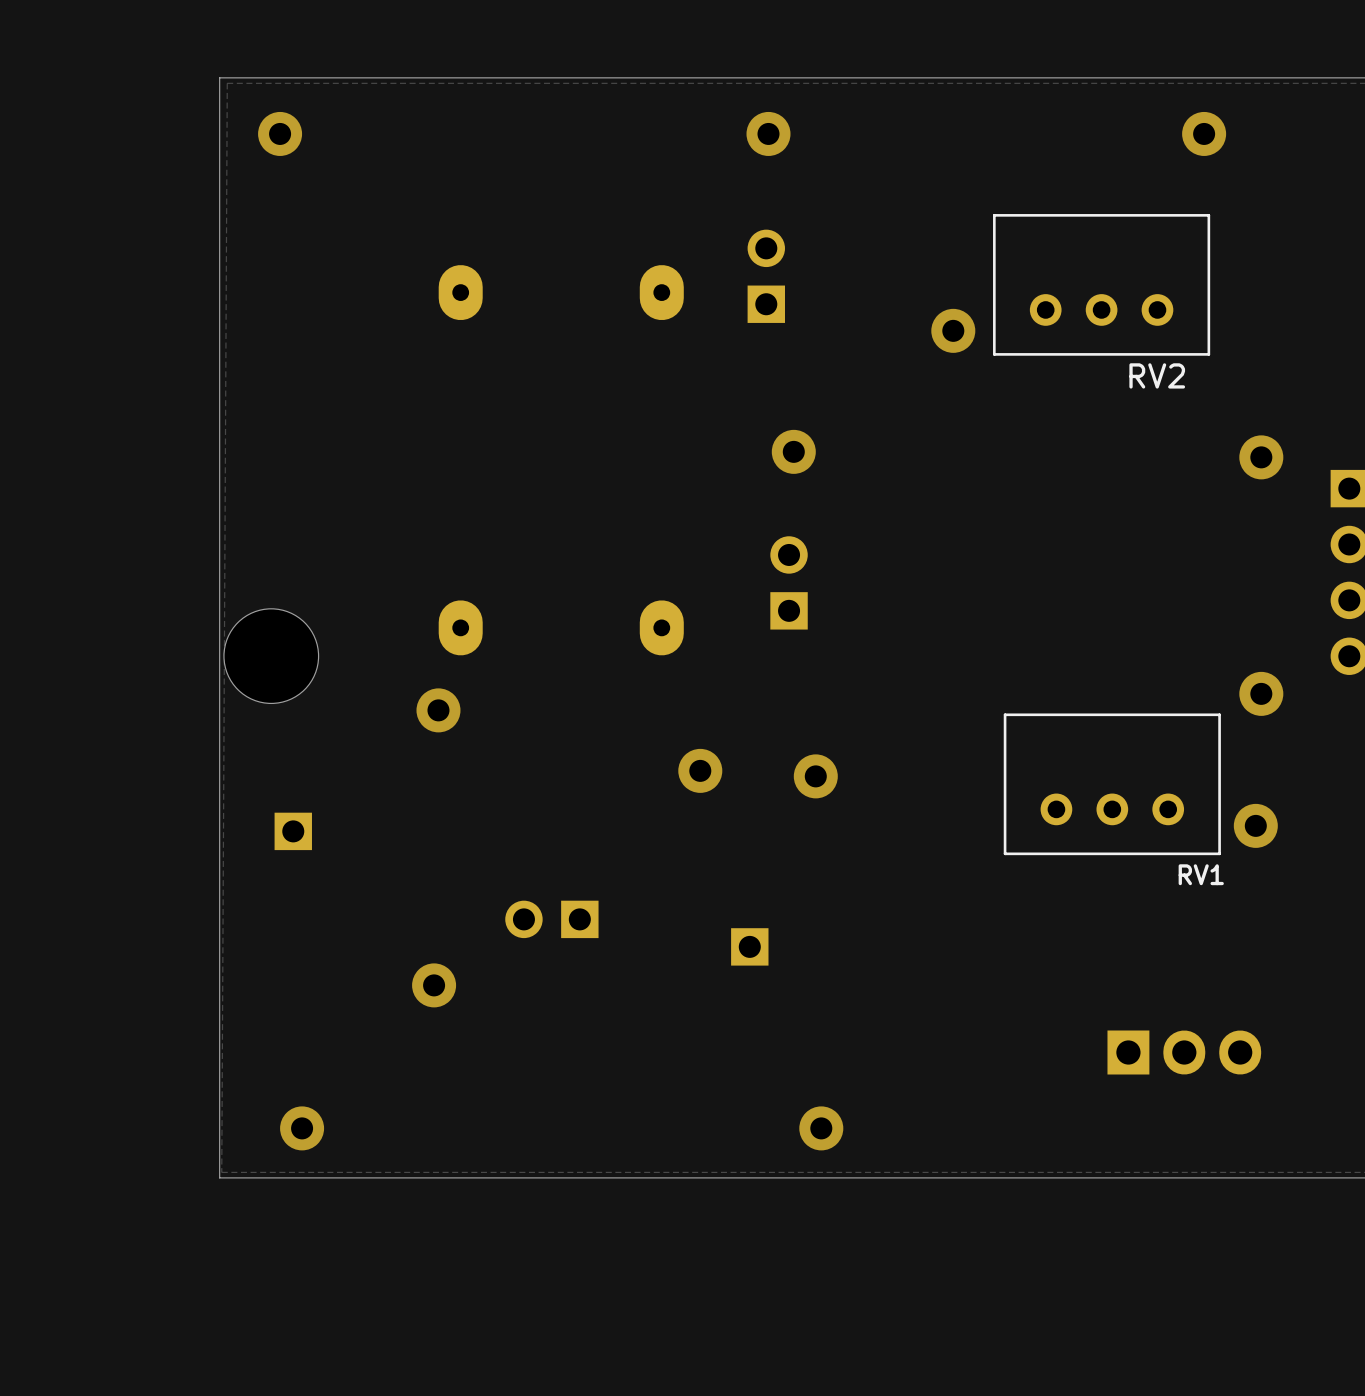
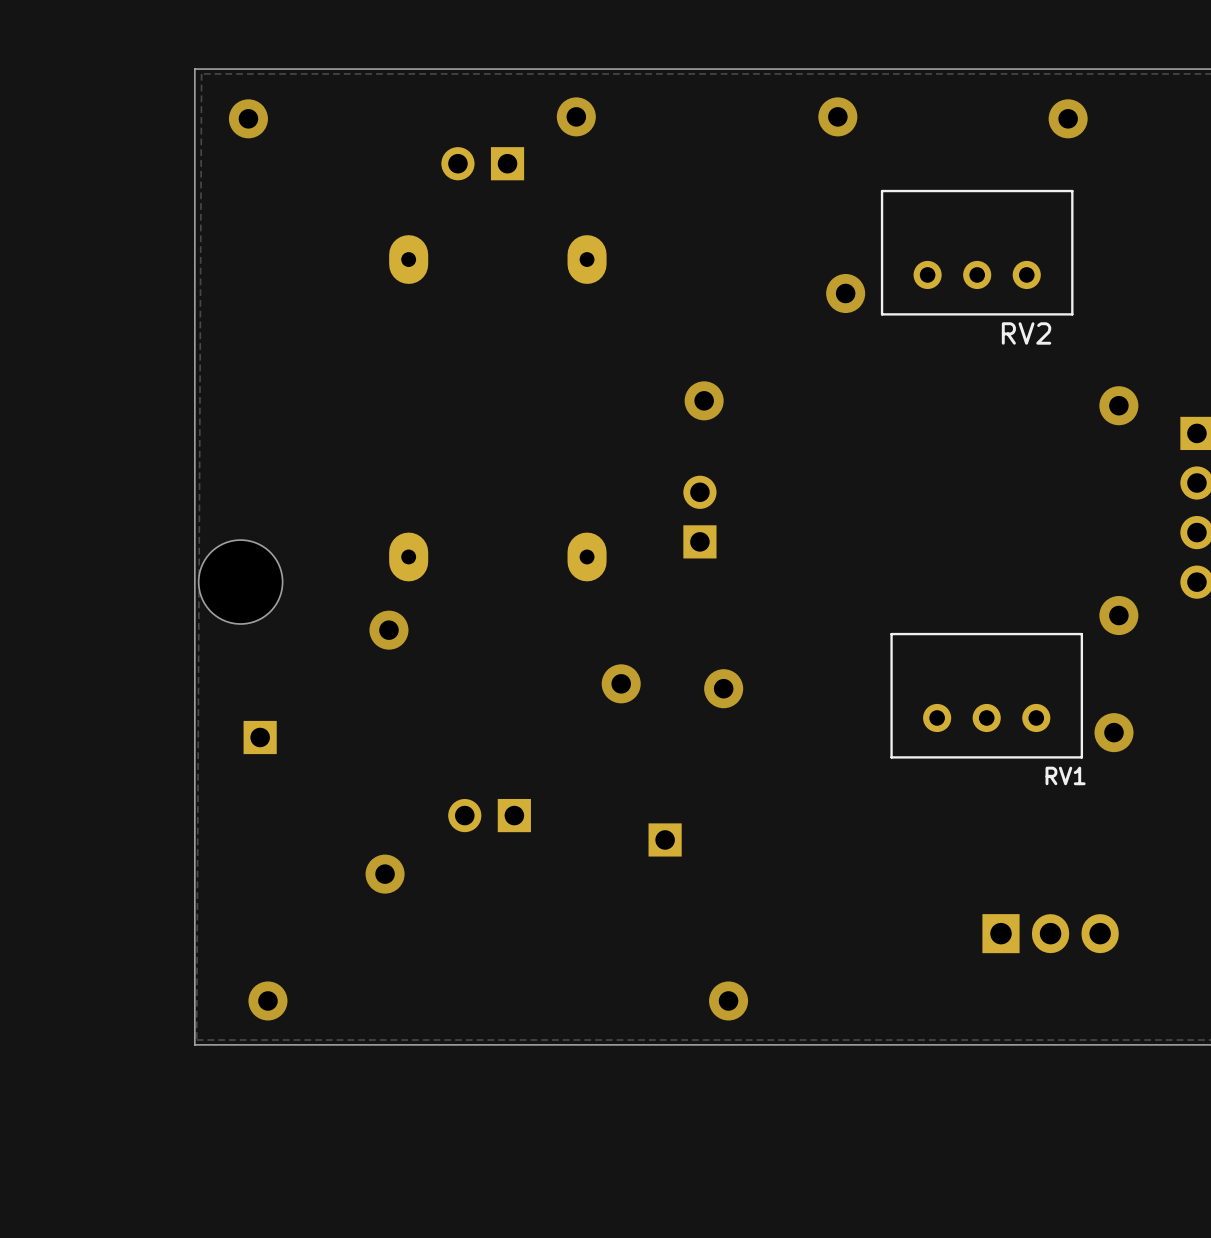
via: none -> (576, 116)
via: none -> (837, 116)
via: (768, 133) -> none
part rotation: 0° (766, 276) -> 90° counterclockwise (482, 163)
part position: (766, 276) -> (482, 163)

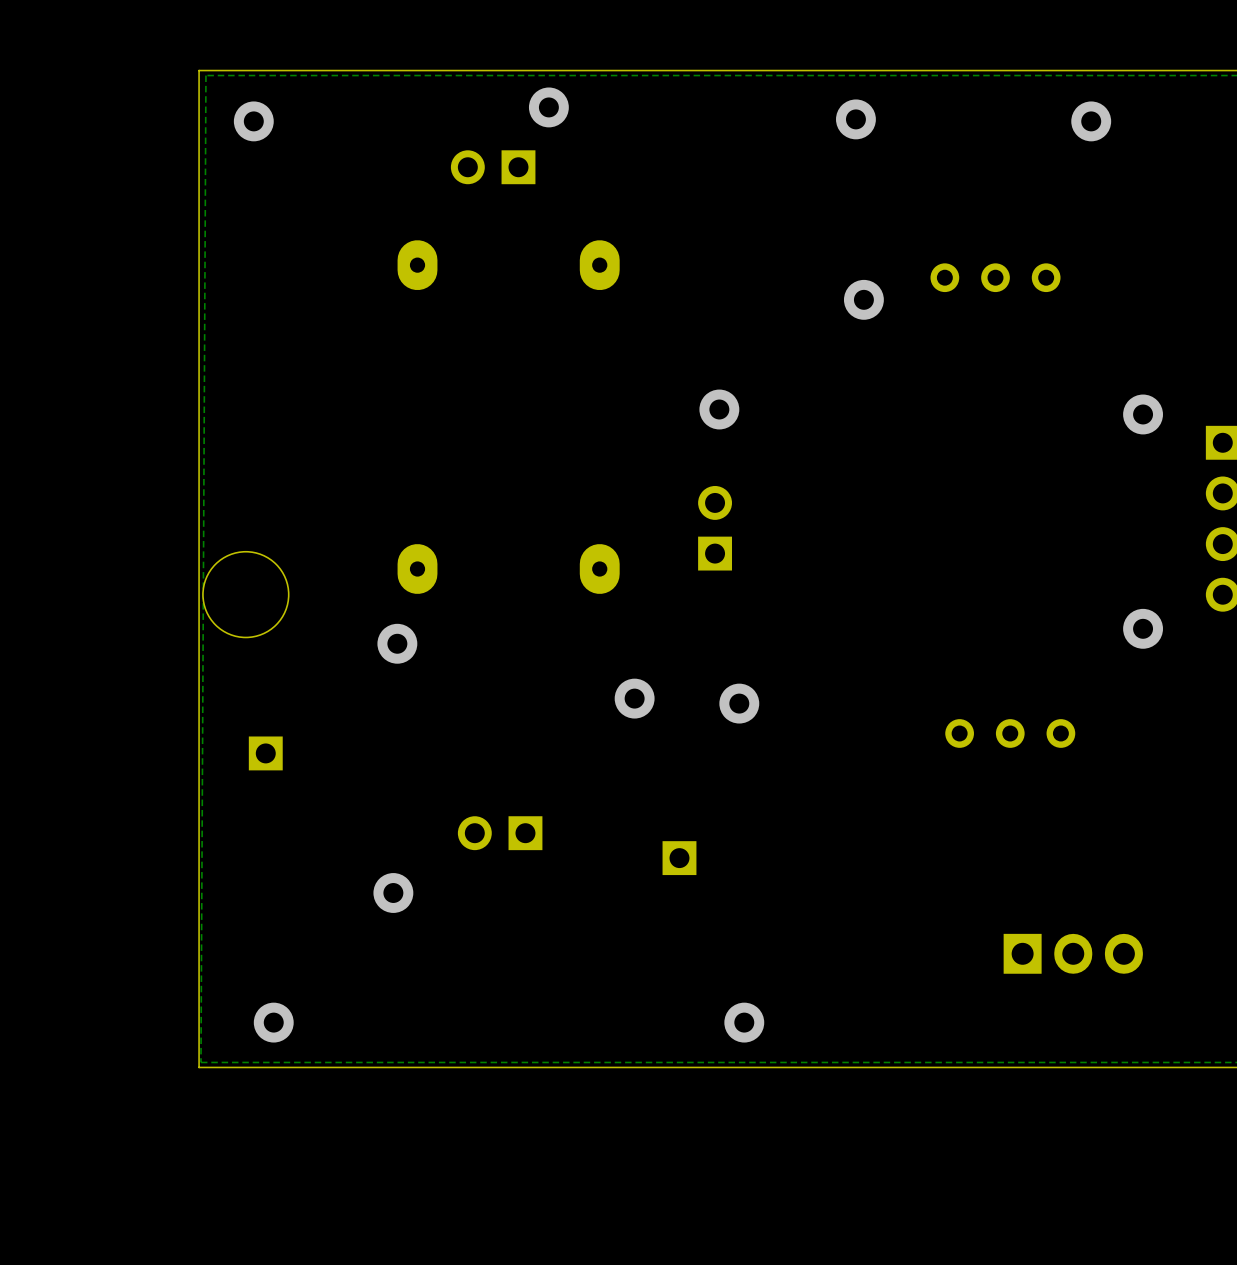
via position: (576, 116) -> (548, 107)
RV2 side: bottom (977, 252) -> top (995, 277)
RV1 side: bottom (986, 695) -> top (1010, 733)
via: (1114, 732) -> none

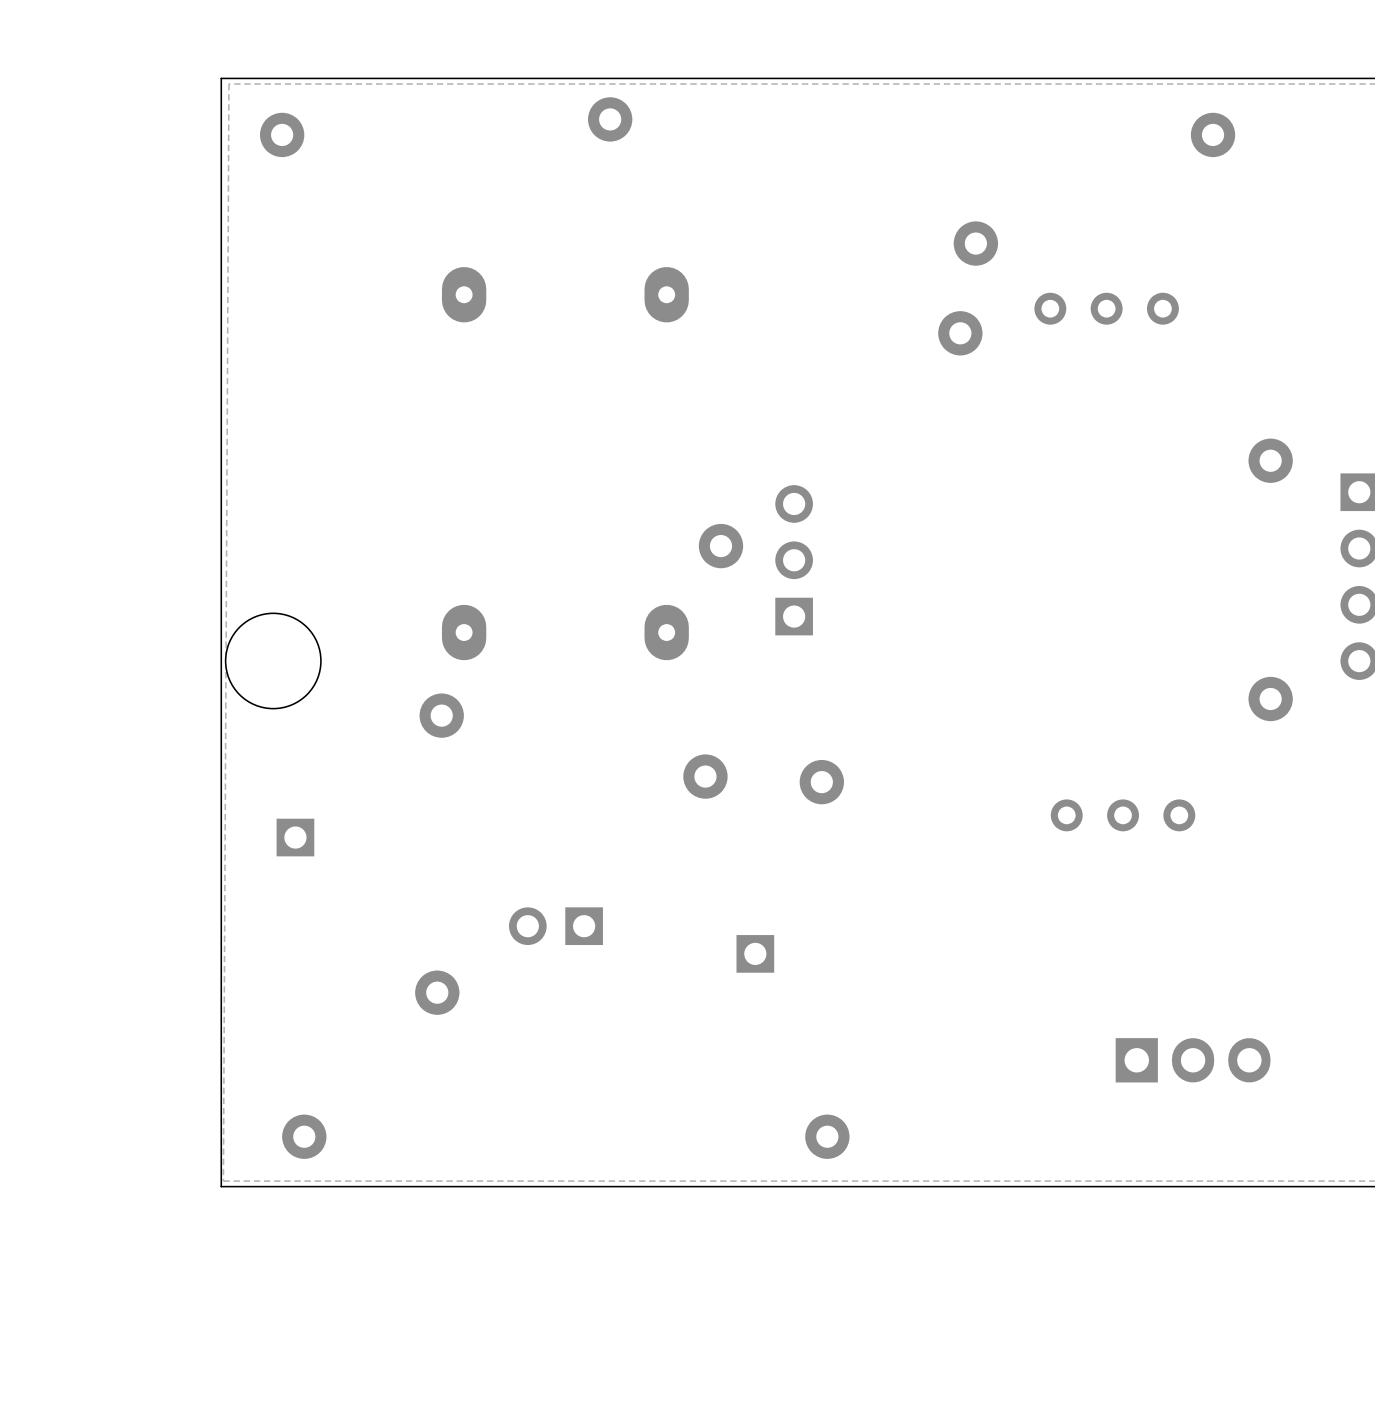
via position: (855, 119) -> (975, 243)
part: (493, 167) -> none
via position: (719, 409) -> (720, 546)
part: none -> (794, 560)
part: (715, 528) -> none

